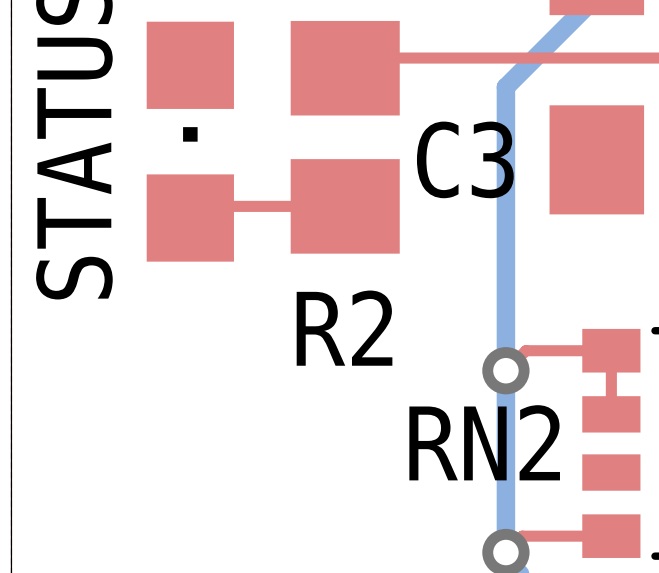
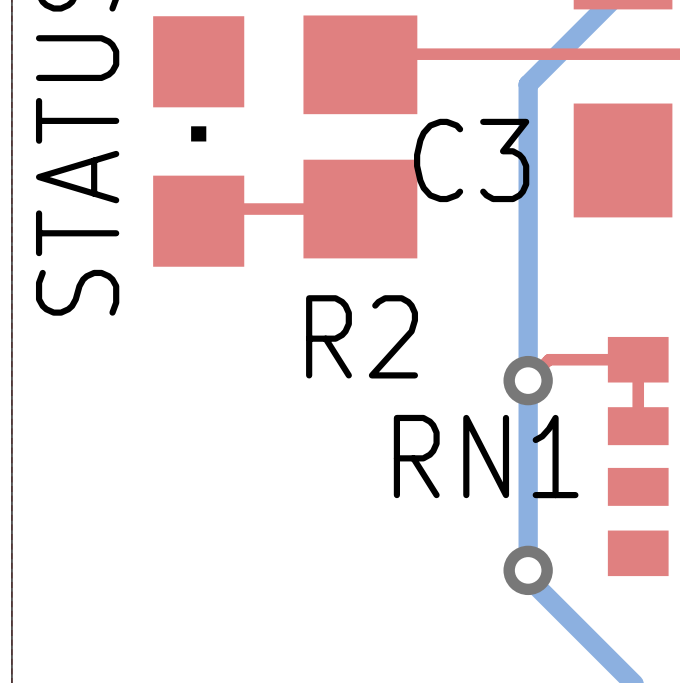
RN2 name: RN2 (484, 442) -> RN1 (486, 456)
top track: (611, 536) (522, 536) (505, 552) -> none

